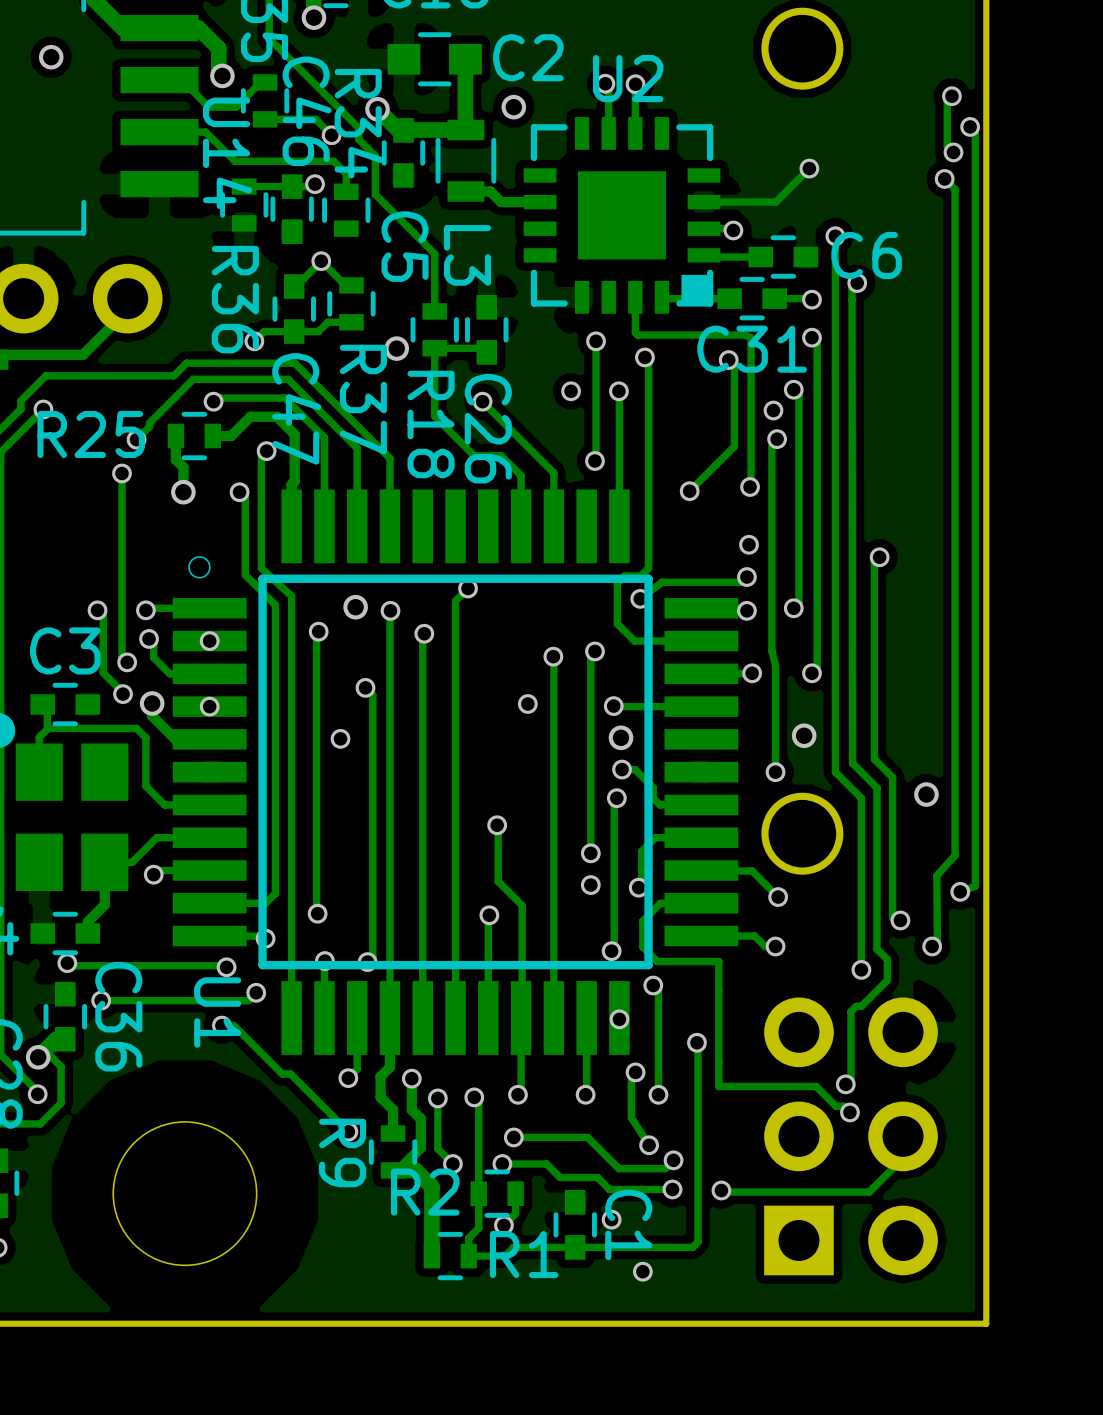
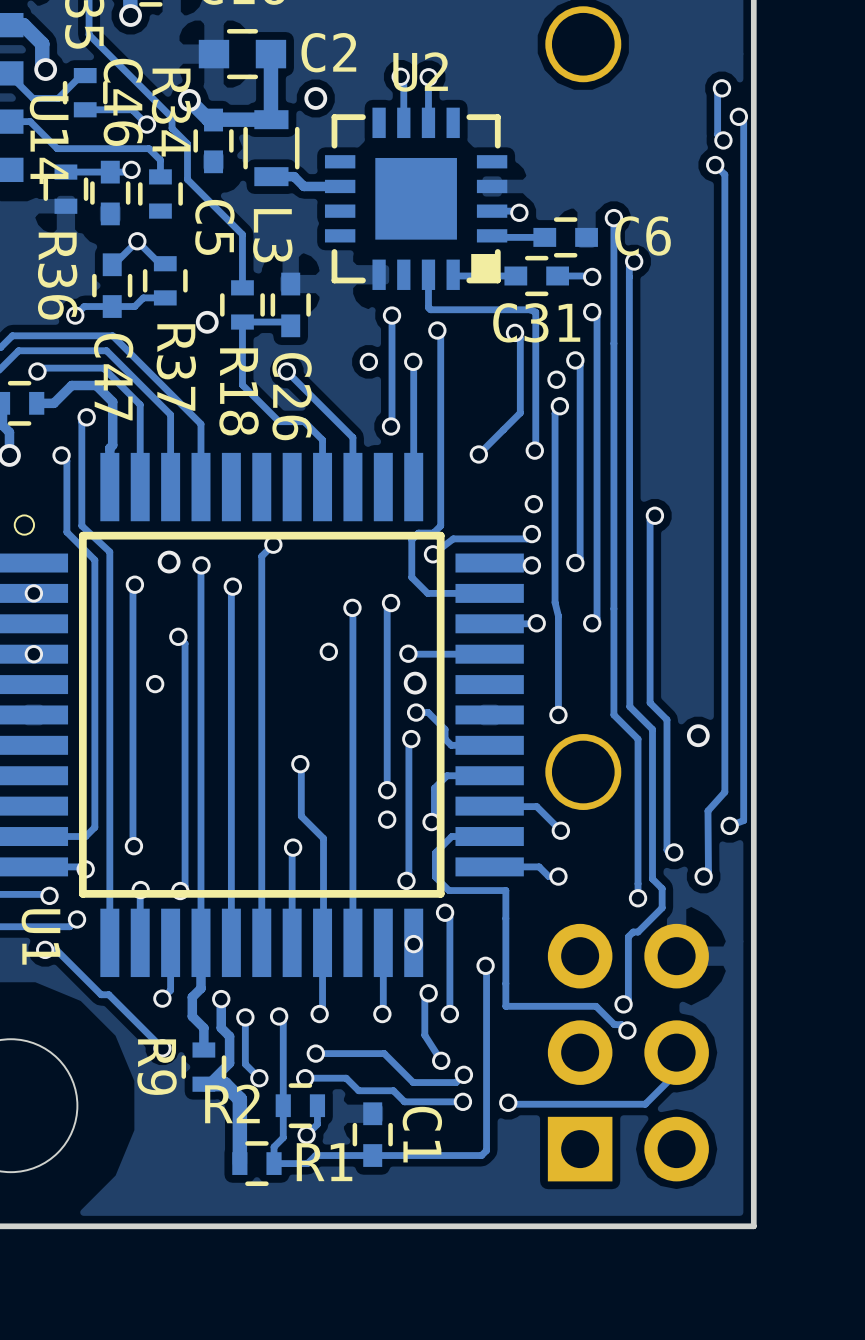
track: (809, 168) (775, 202) (703, 202) -> none
via: (809, 168) -> none
via: (804, 735) -> none
via: (611, 1219) -> none
via: (642, 1271) -> none

